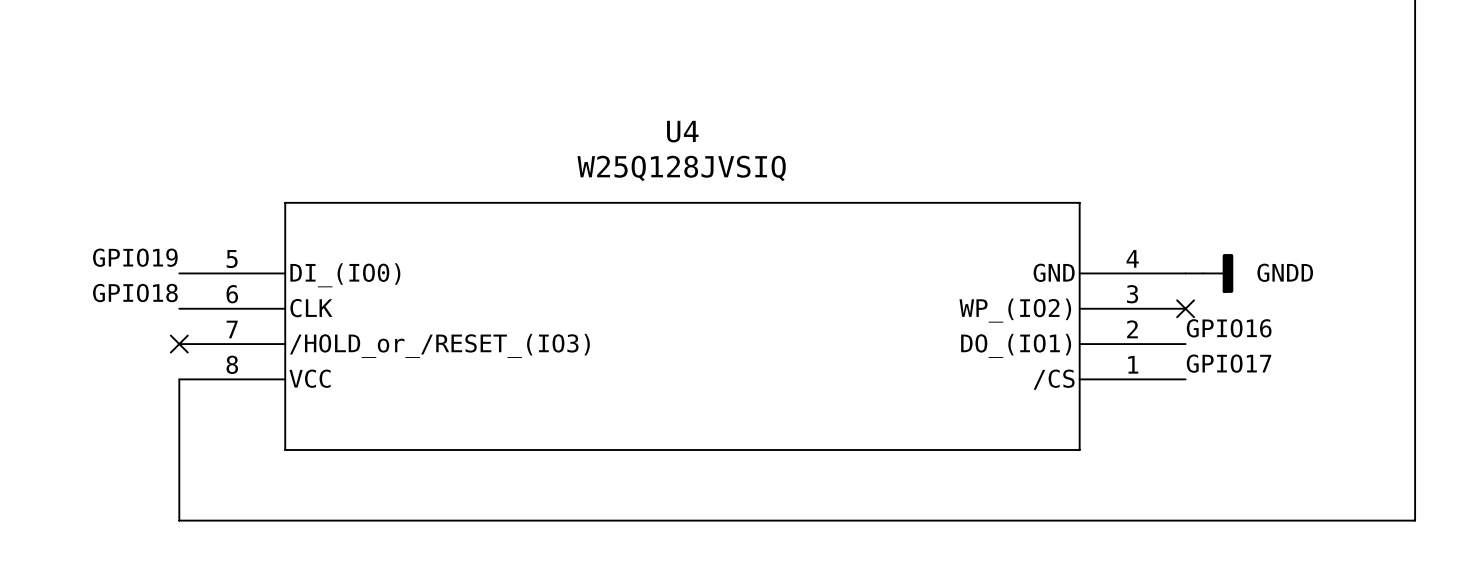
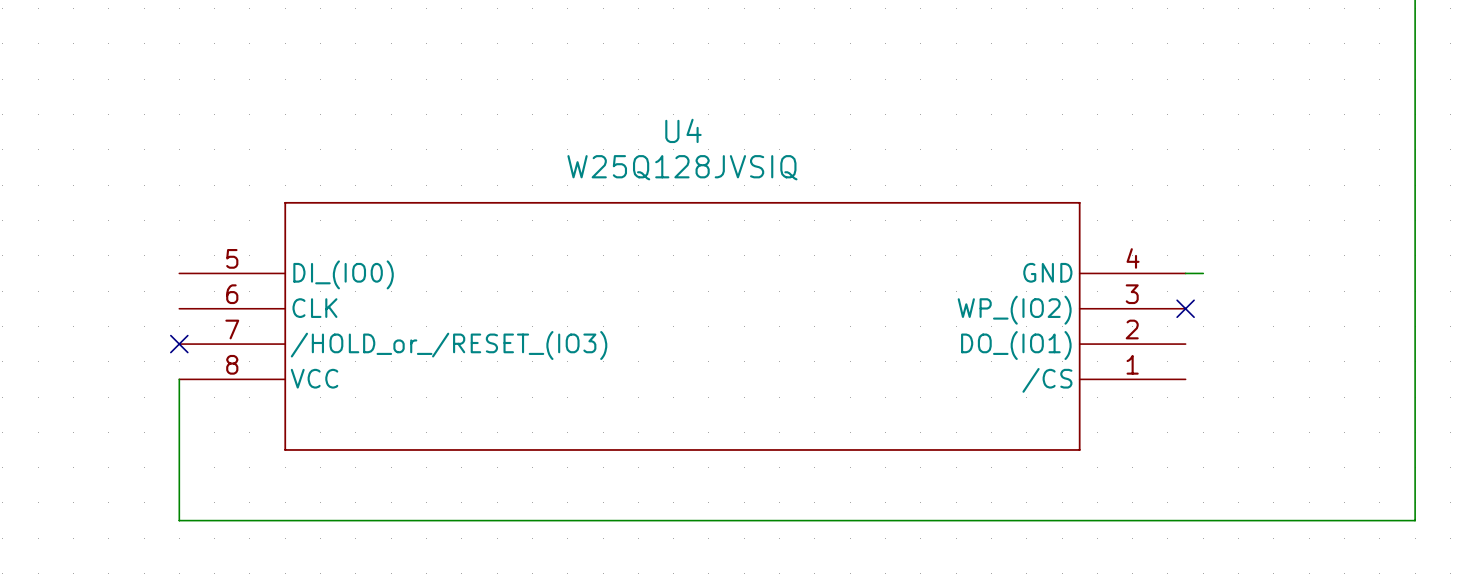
label: GPIO19 (135, 257) -> none
power symbol: GNDD (1218, 273) -> none
label: GPIO18 (135, 293) -> none
label: GPIO16 (1229, 328) -> none
label: GPIO17 (1229, 363) -> none

